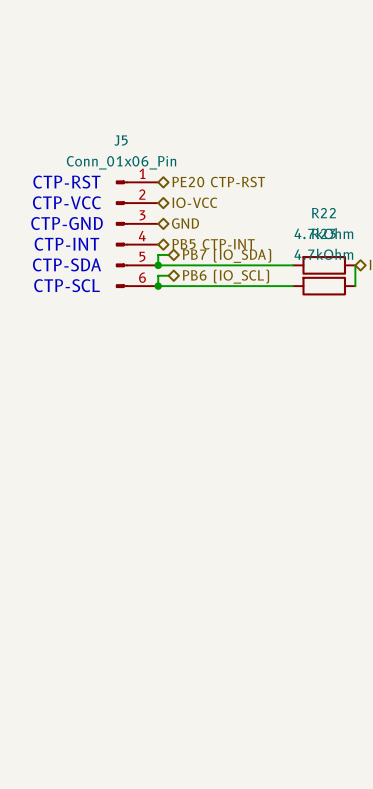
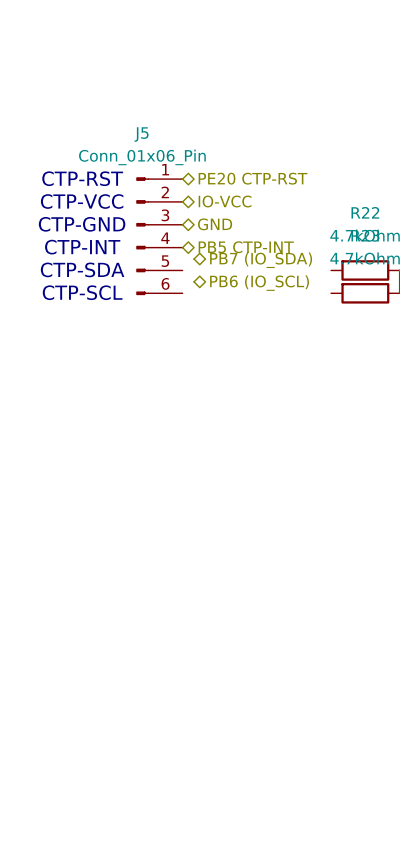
wire: (168, 254) (158, 254) (158, 265) (293, 265) -> none
junction: (158, 265) -> none
wire: (168, 275) (158, 275) (158, 286) (293, 286) -> none
junction: (158, 286) -> none

